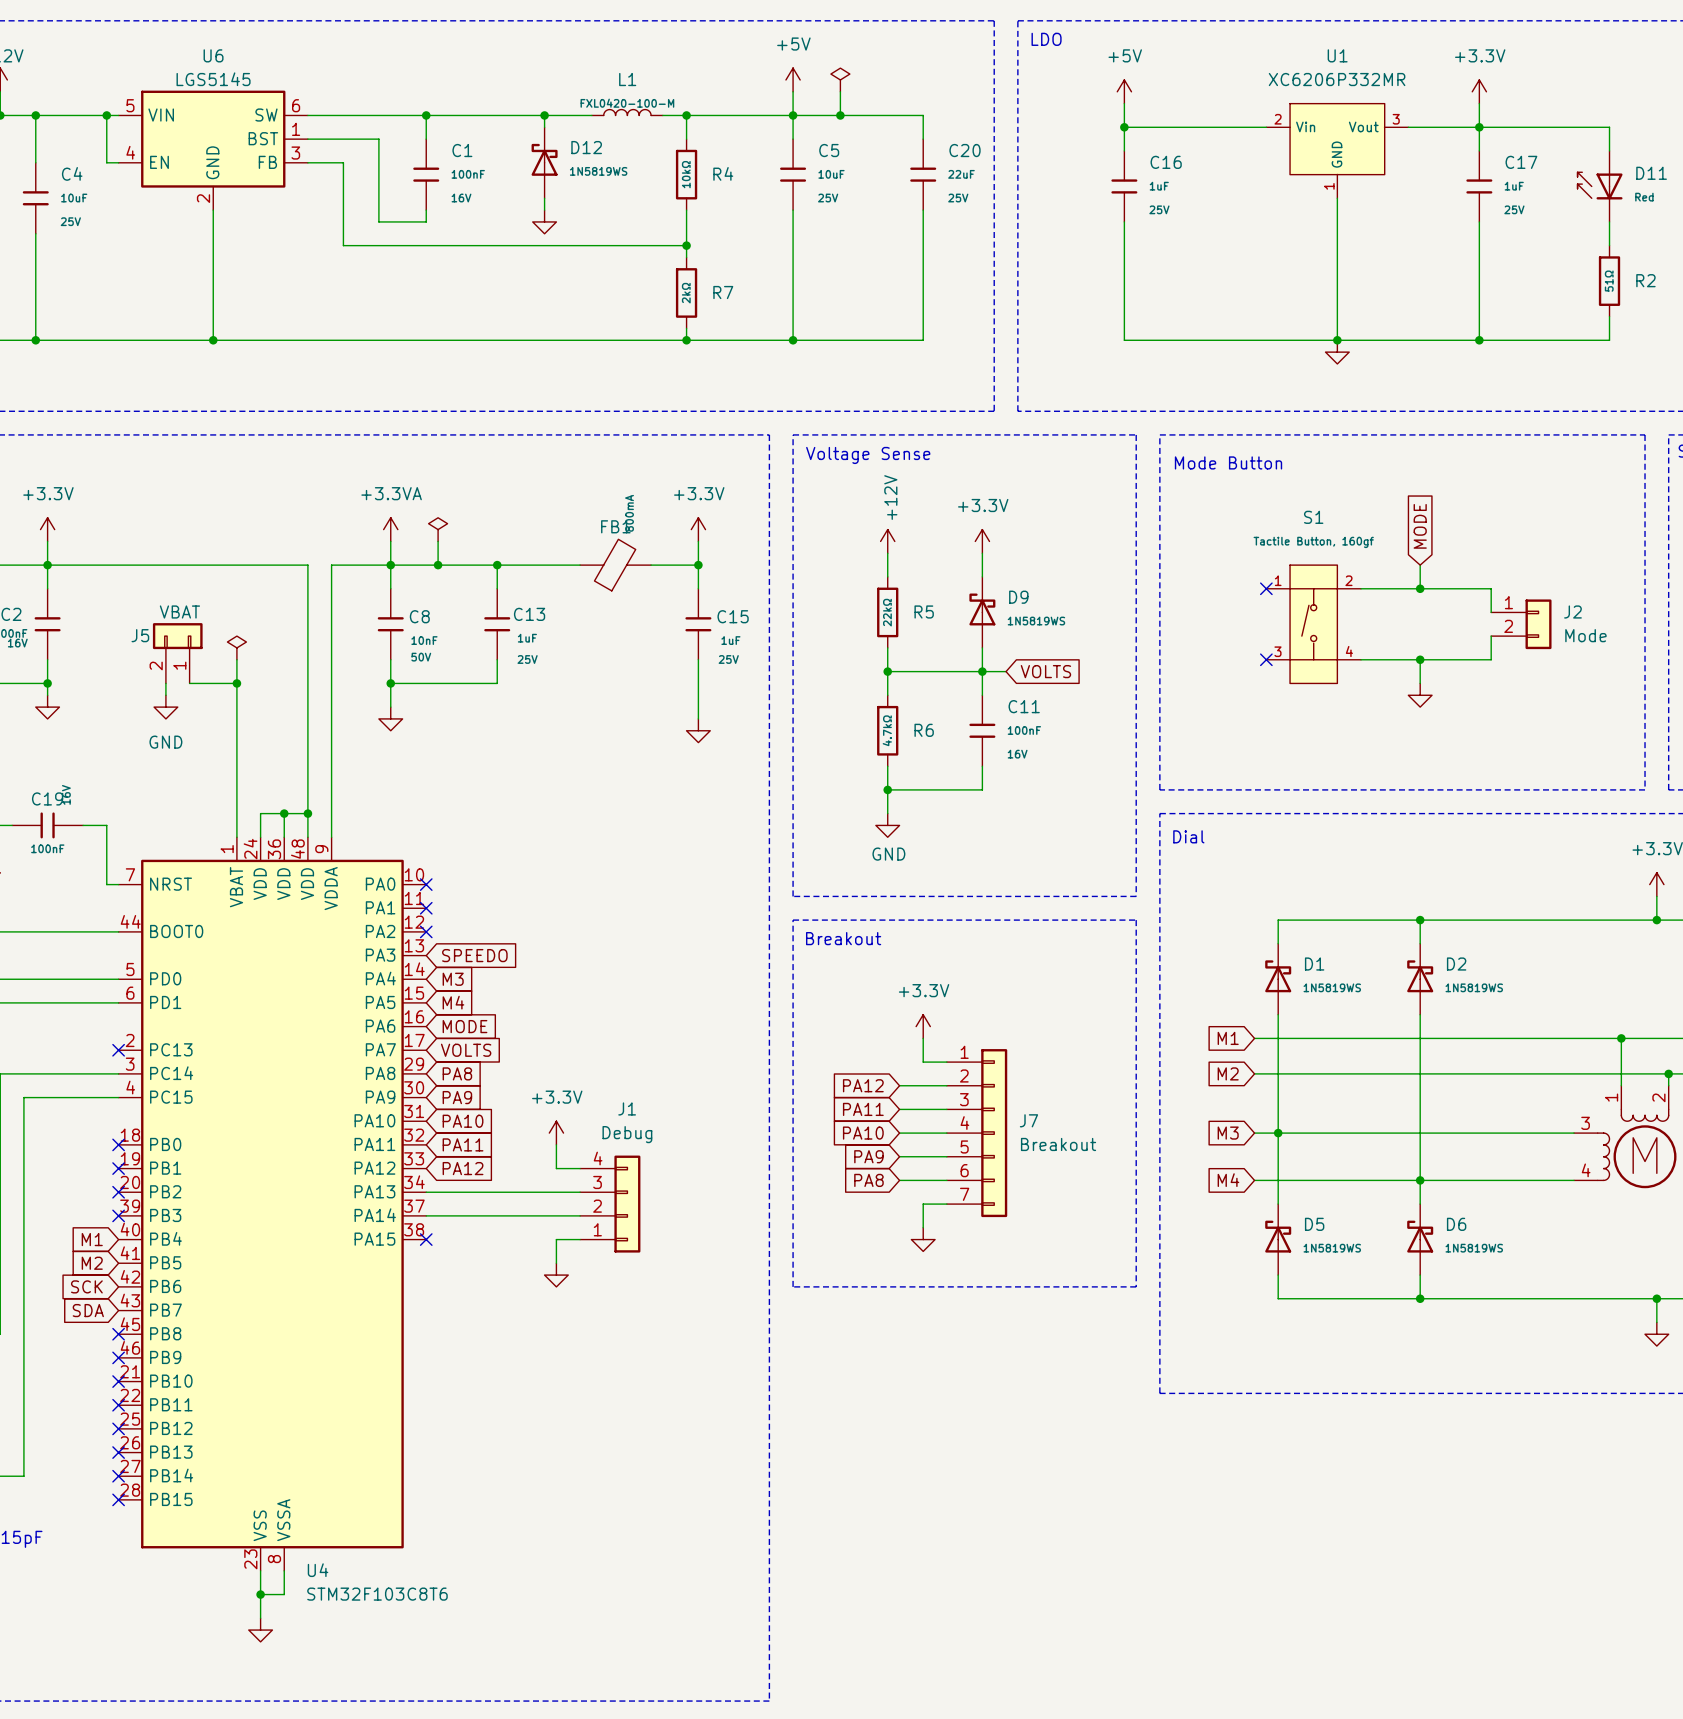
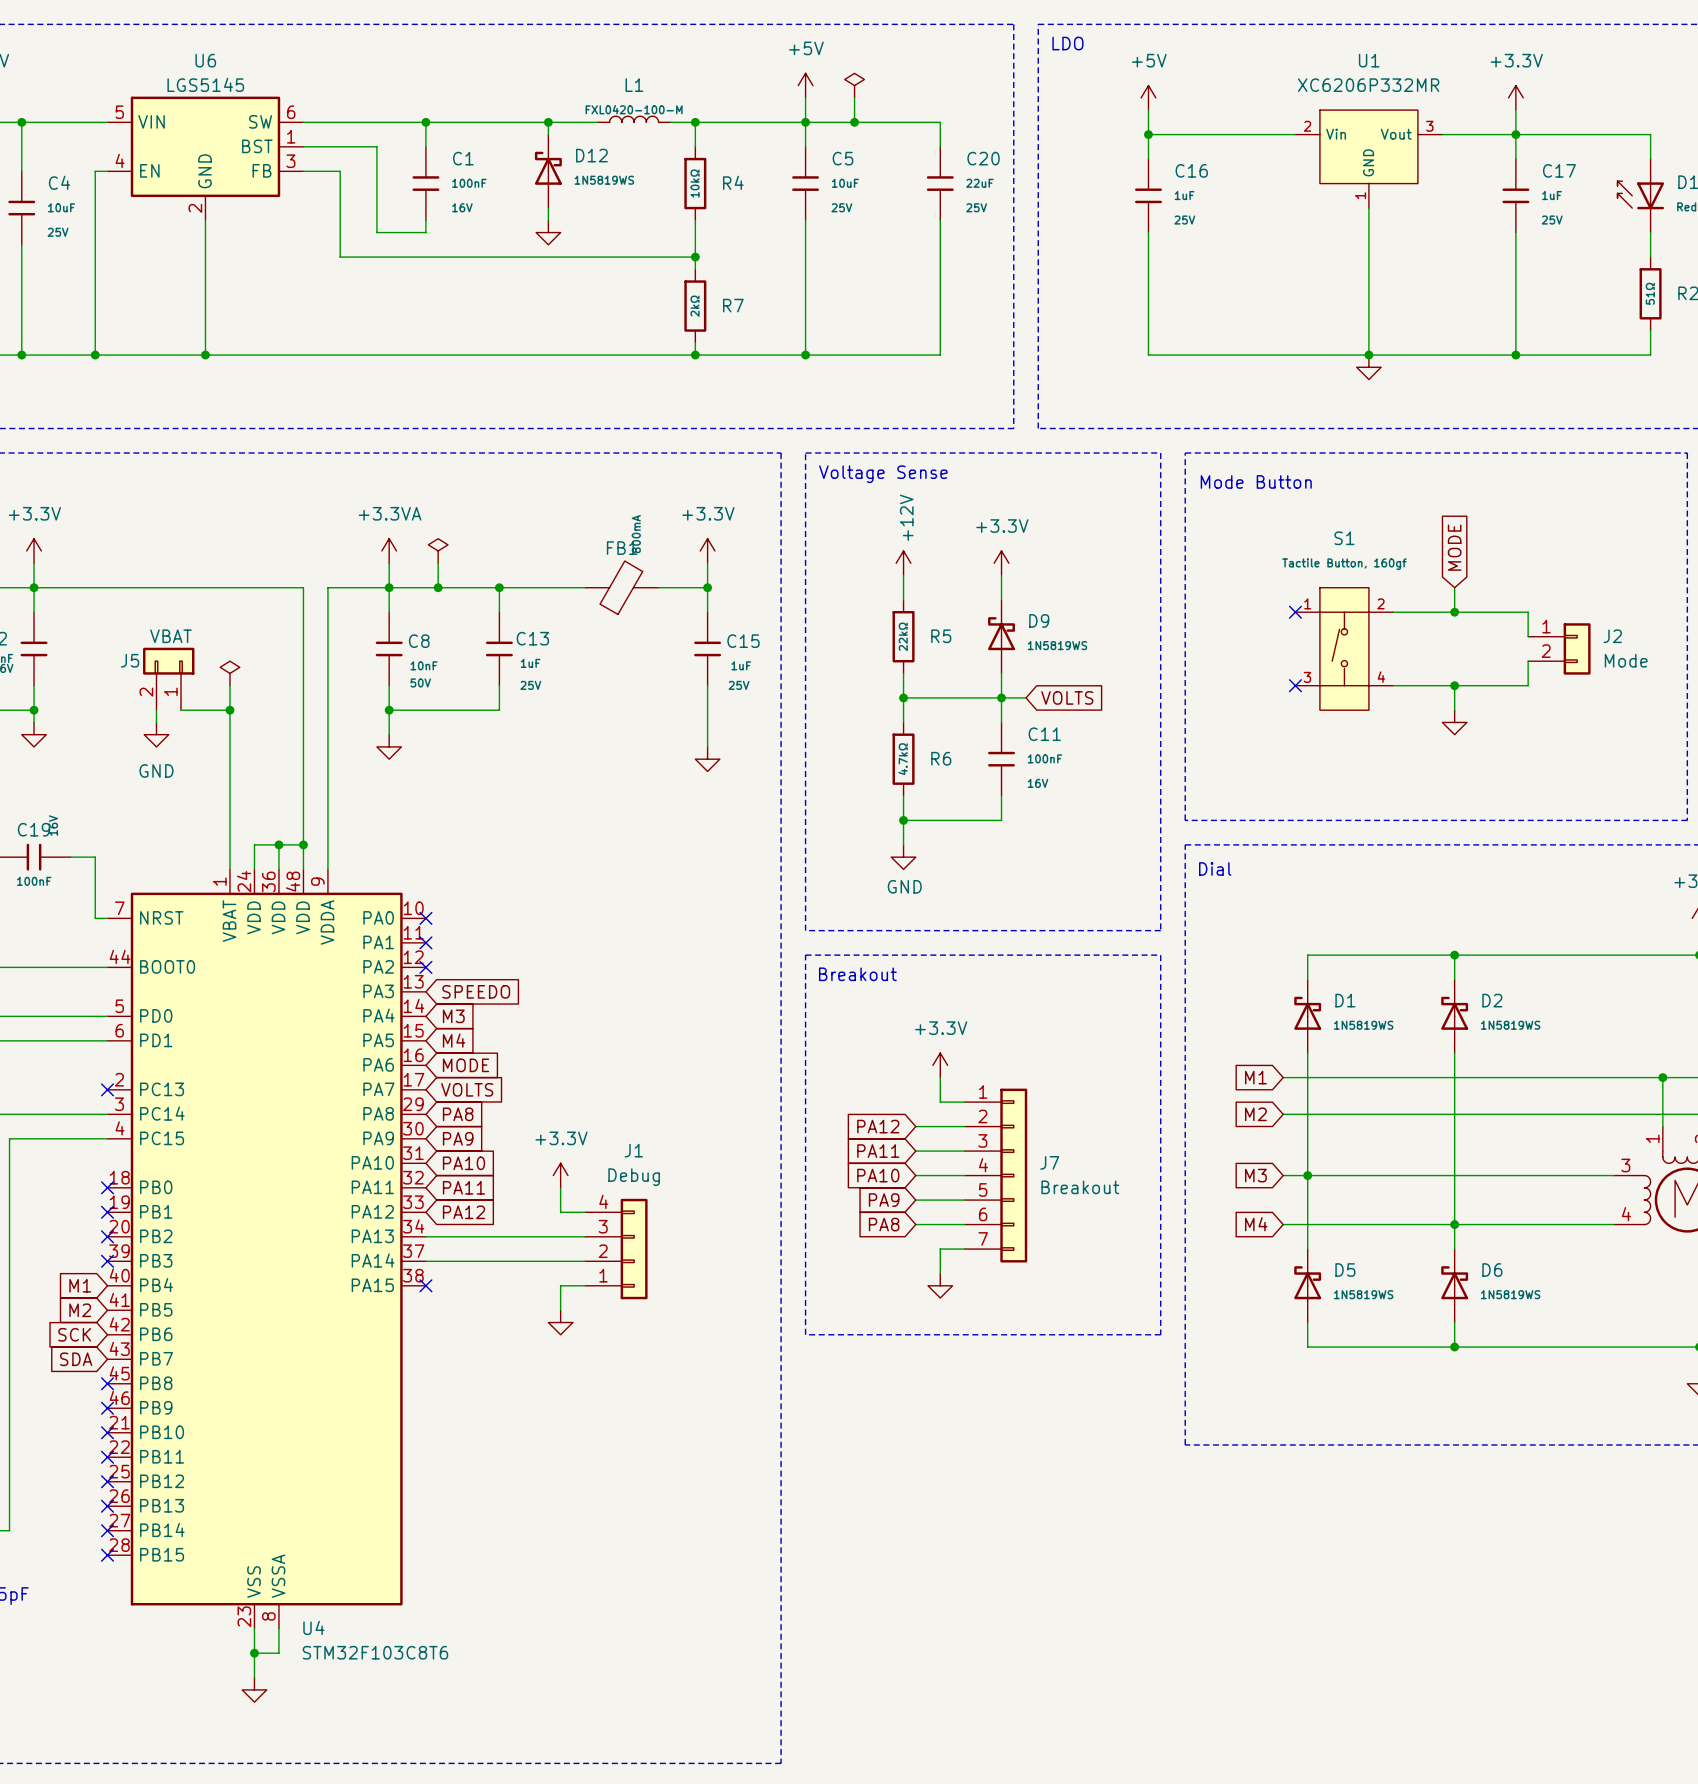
wire: (106, 115) (106, 162) -> (95, 355) (95, 171)
junction: (106, 115) -> none
junction: none -> (95, 355)

